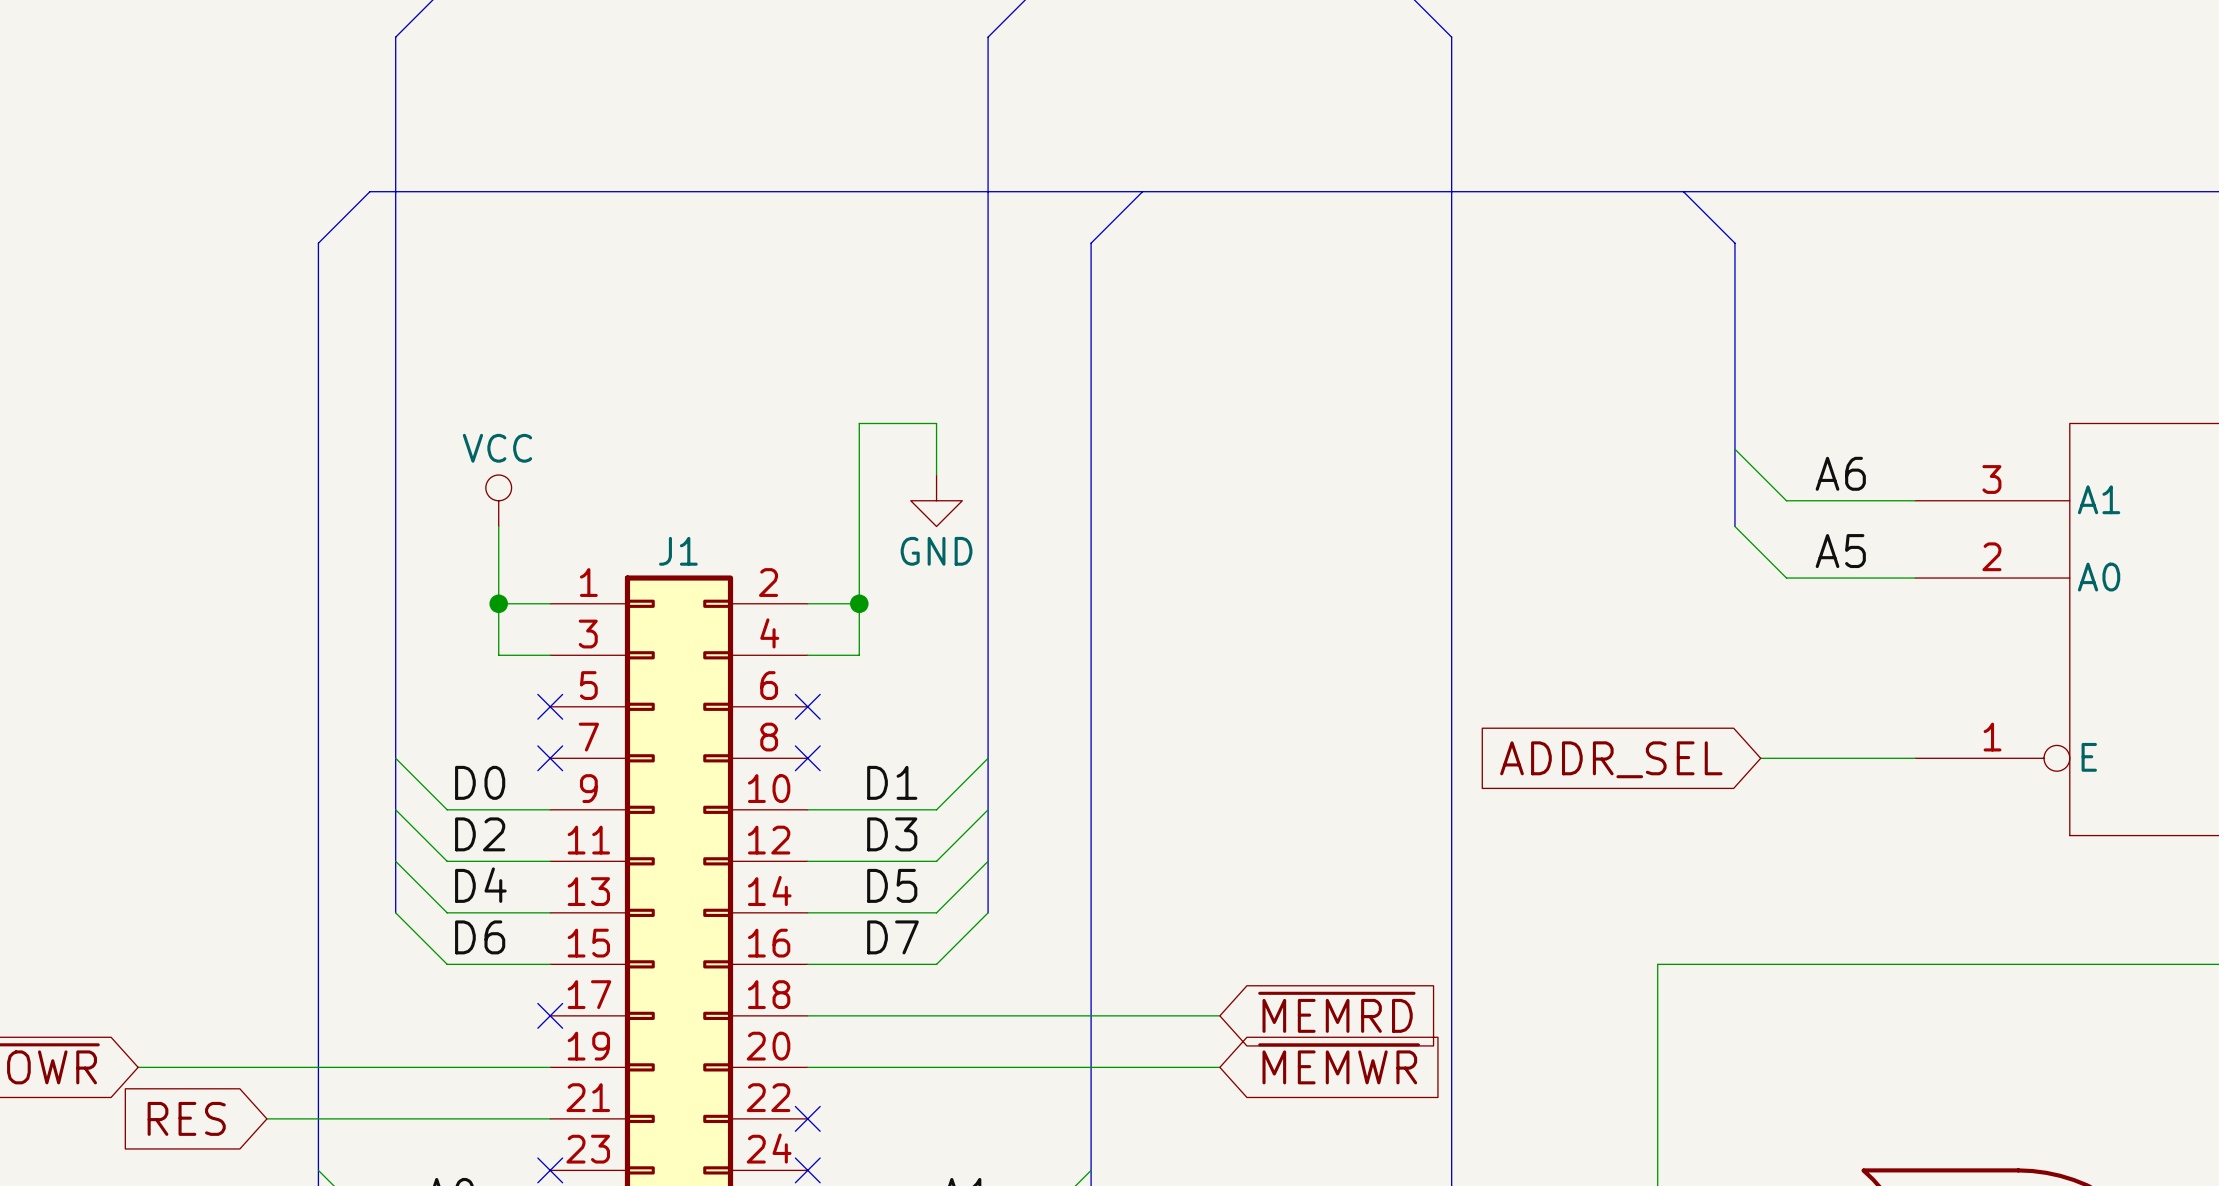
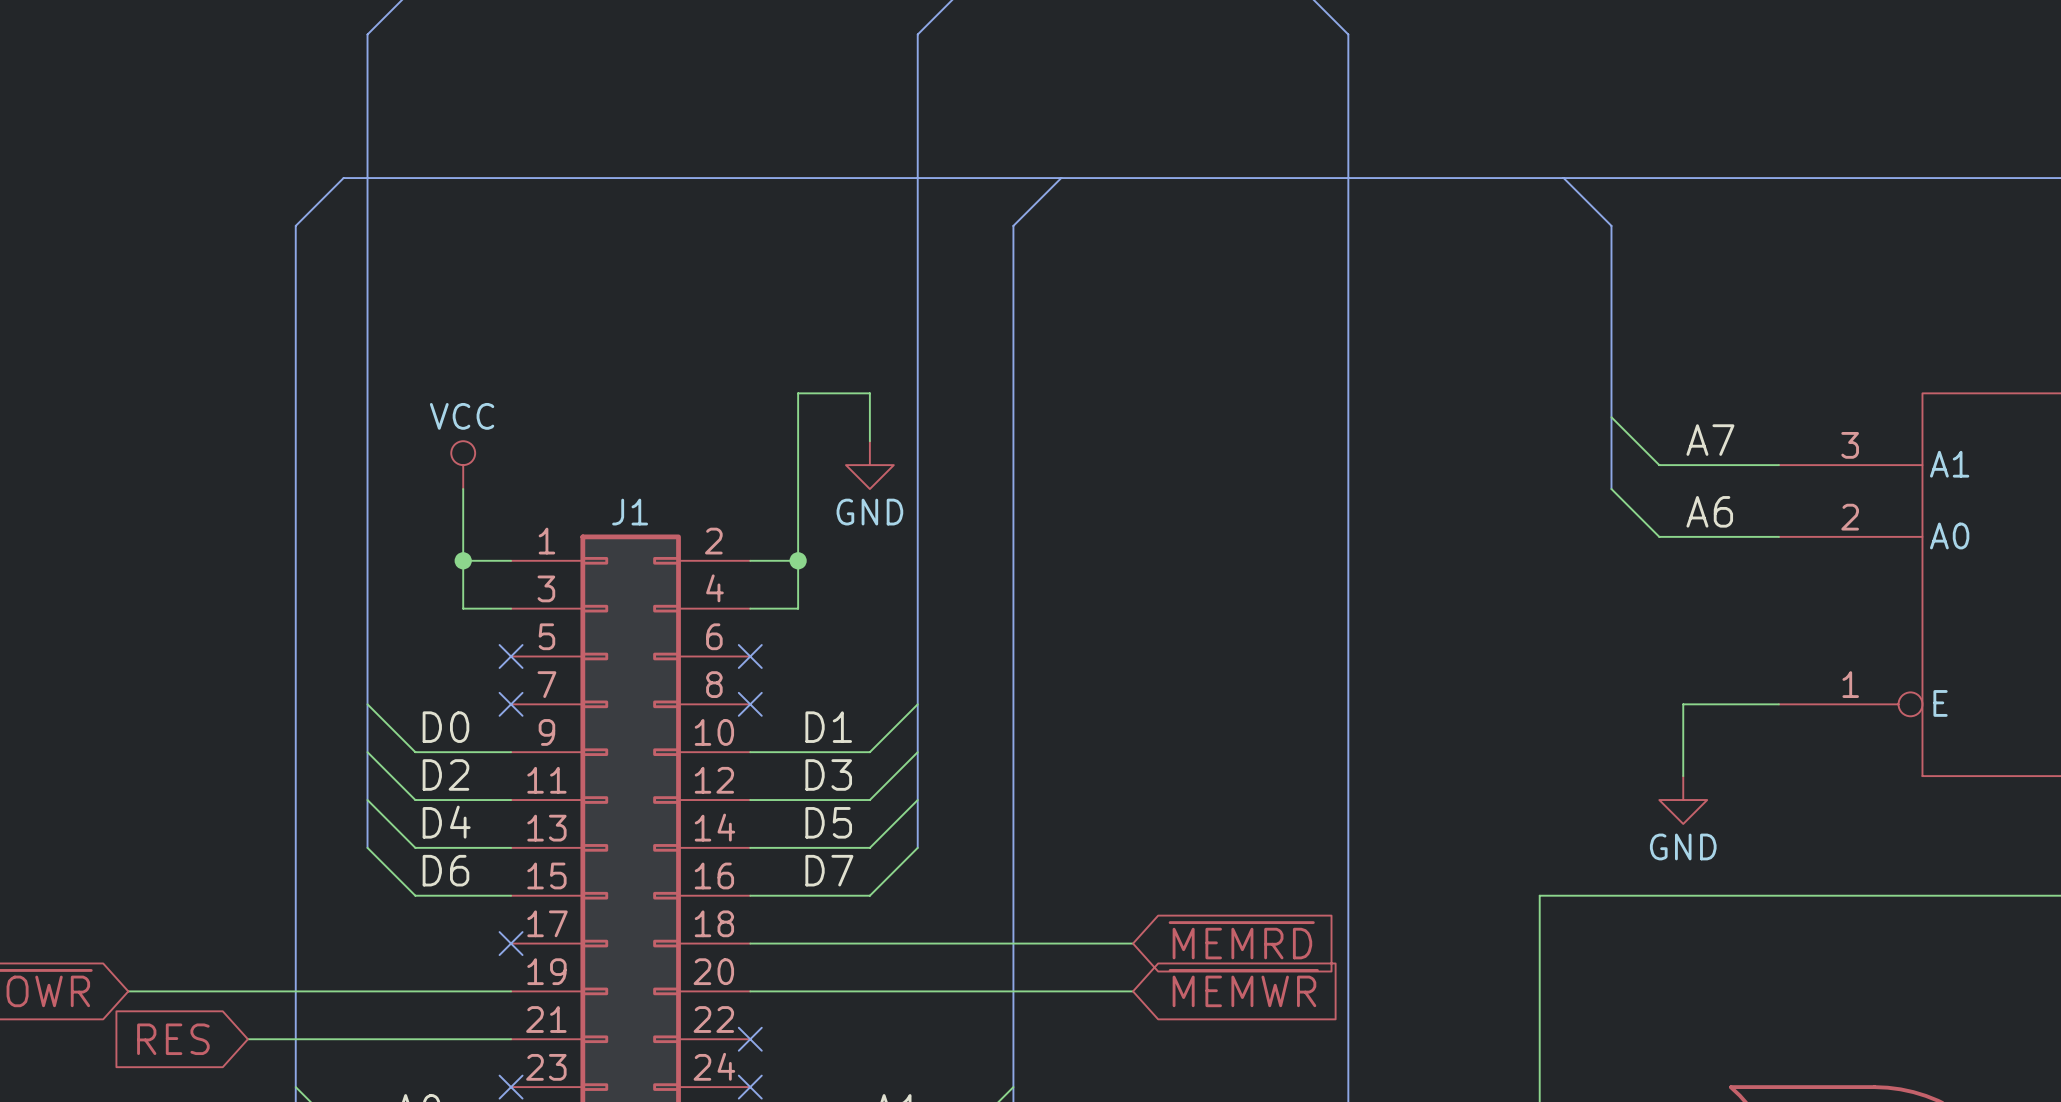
label: A6 (1840, 473) -> A7 (1710, 440)
label: A5 (1840, 551) -> A6 (1709, 511)
wire: (1760, 758) (1812, 758) -> (1683, 776) (1683, 704)
global label: ADDR_SEL (1611, 759) -> none
power symbol: none -> GND (1683, 800)

